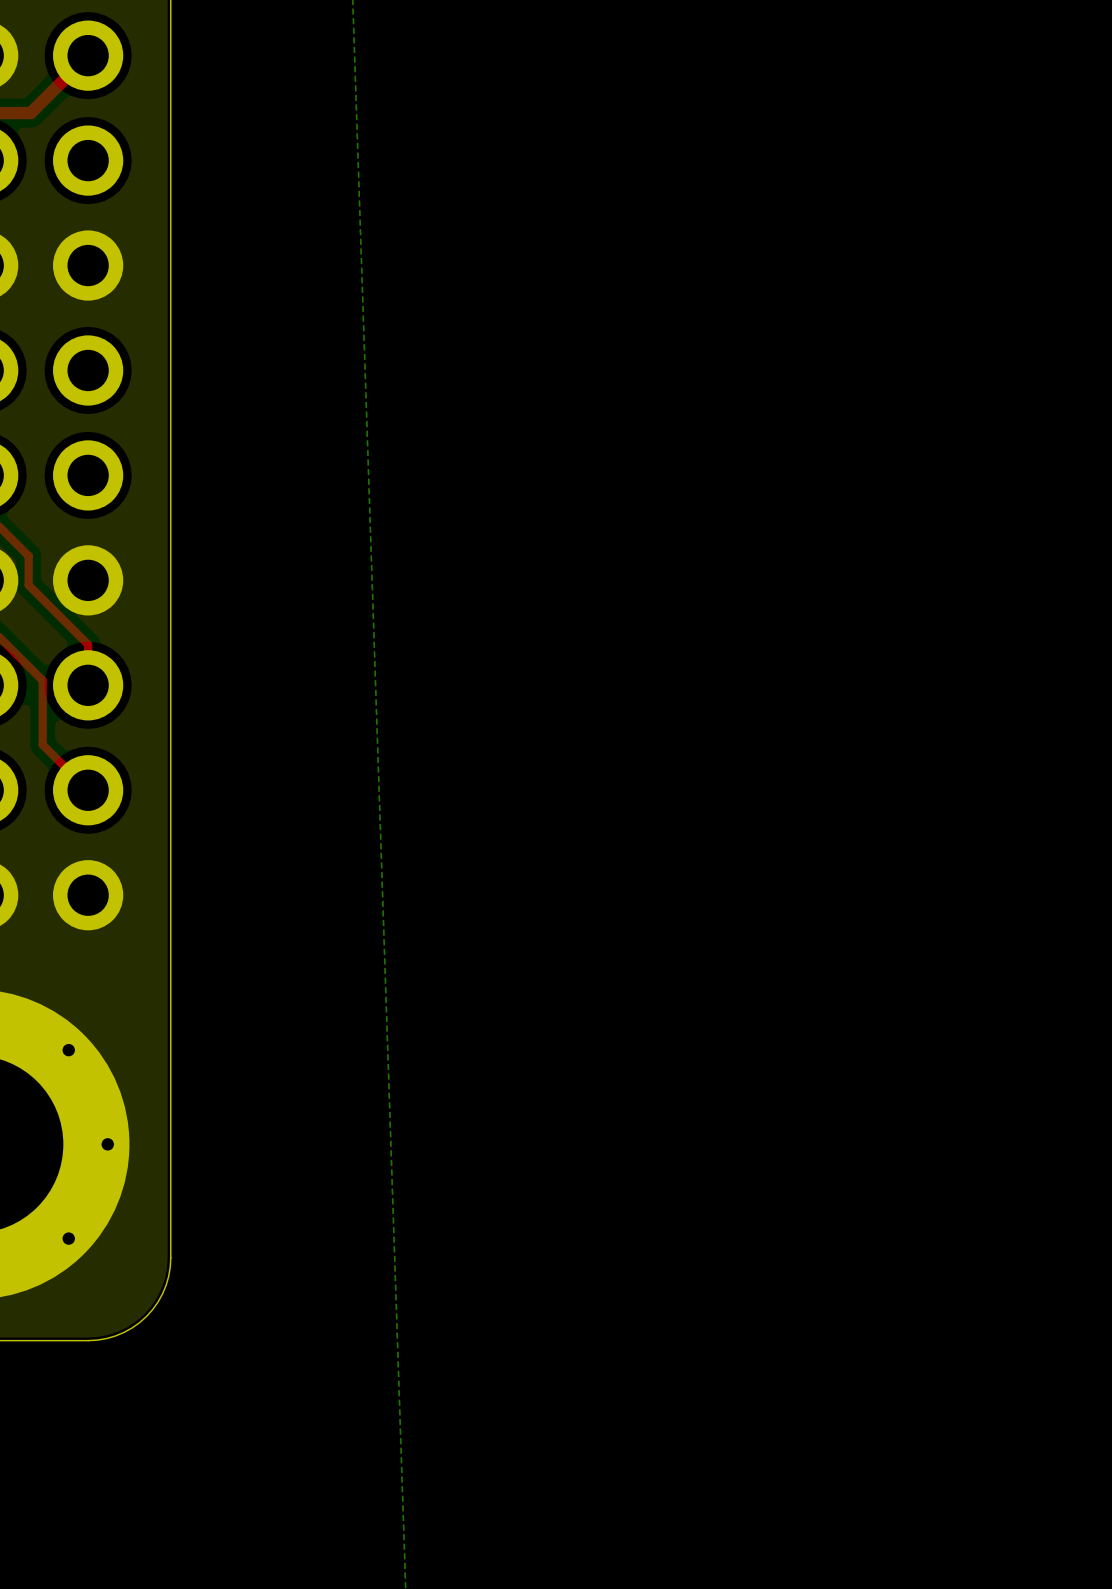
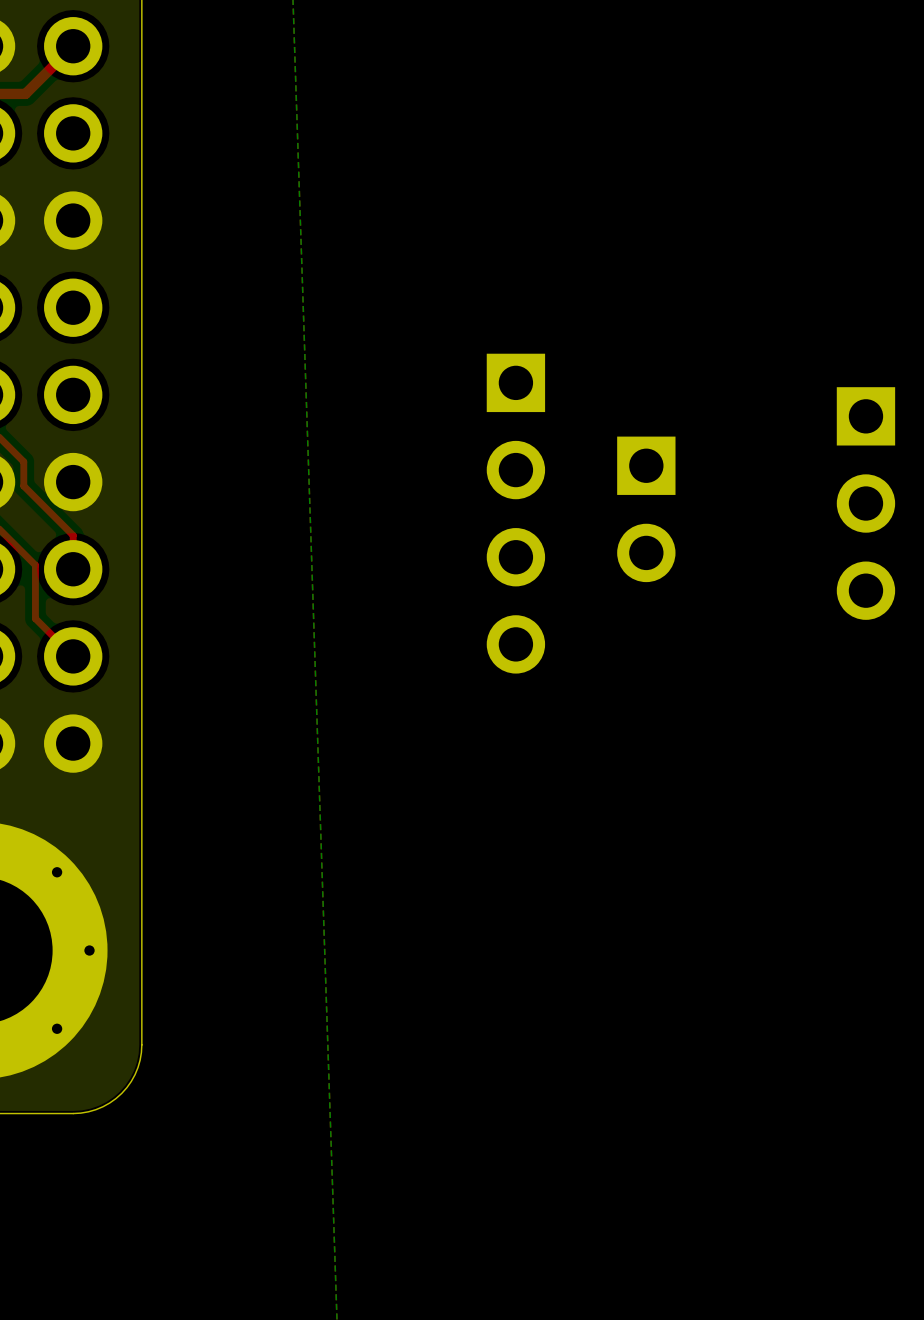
part: none -> (865, 503)
part: none -> (646, 509)
part: none -> (515, 513)

